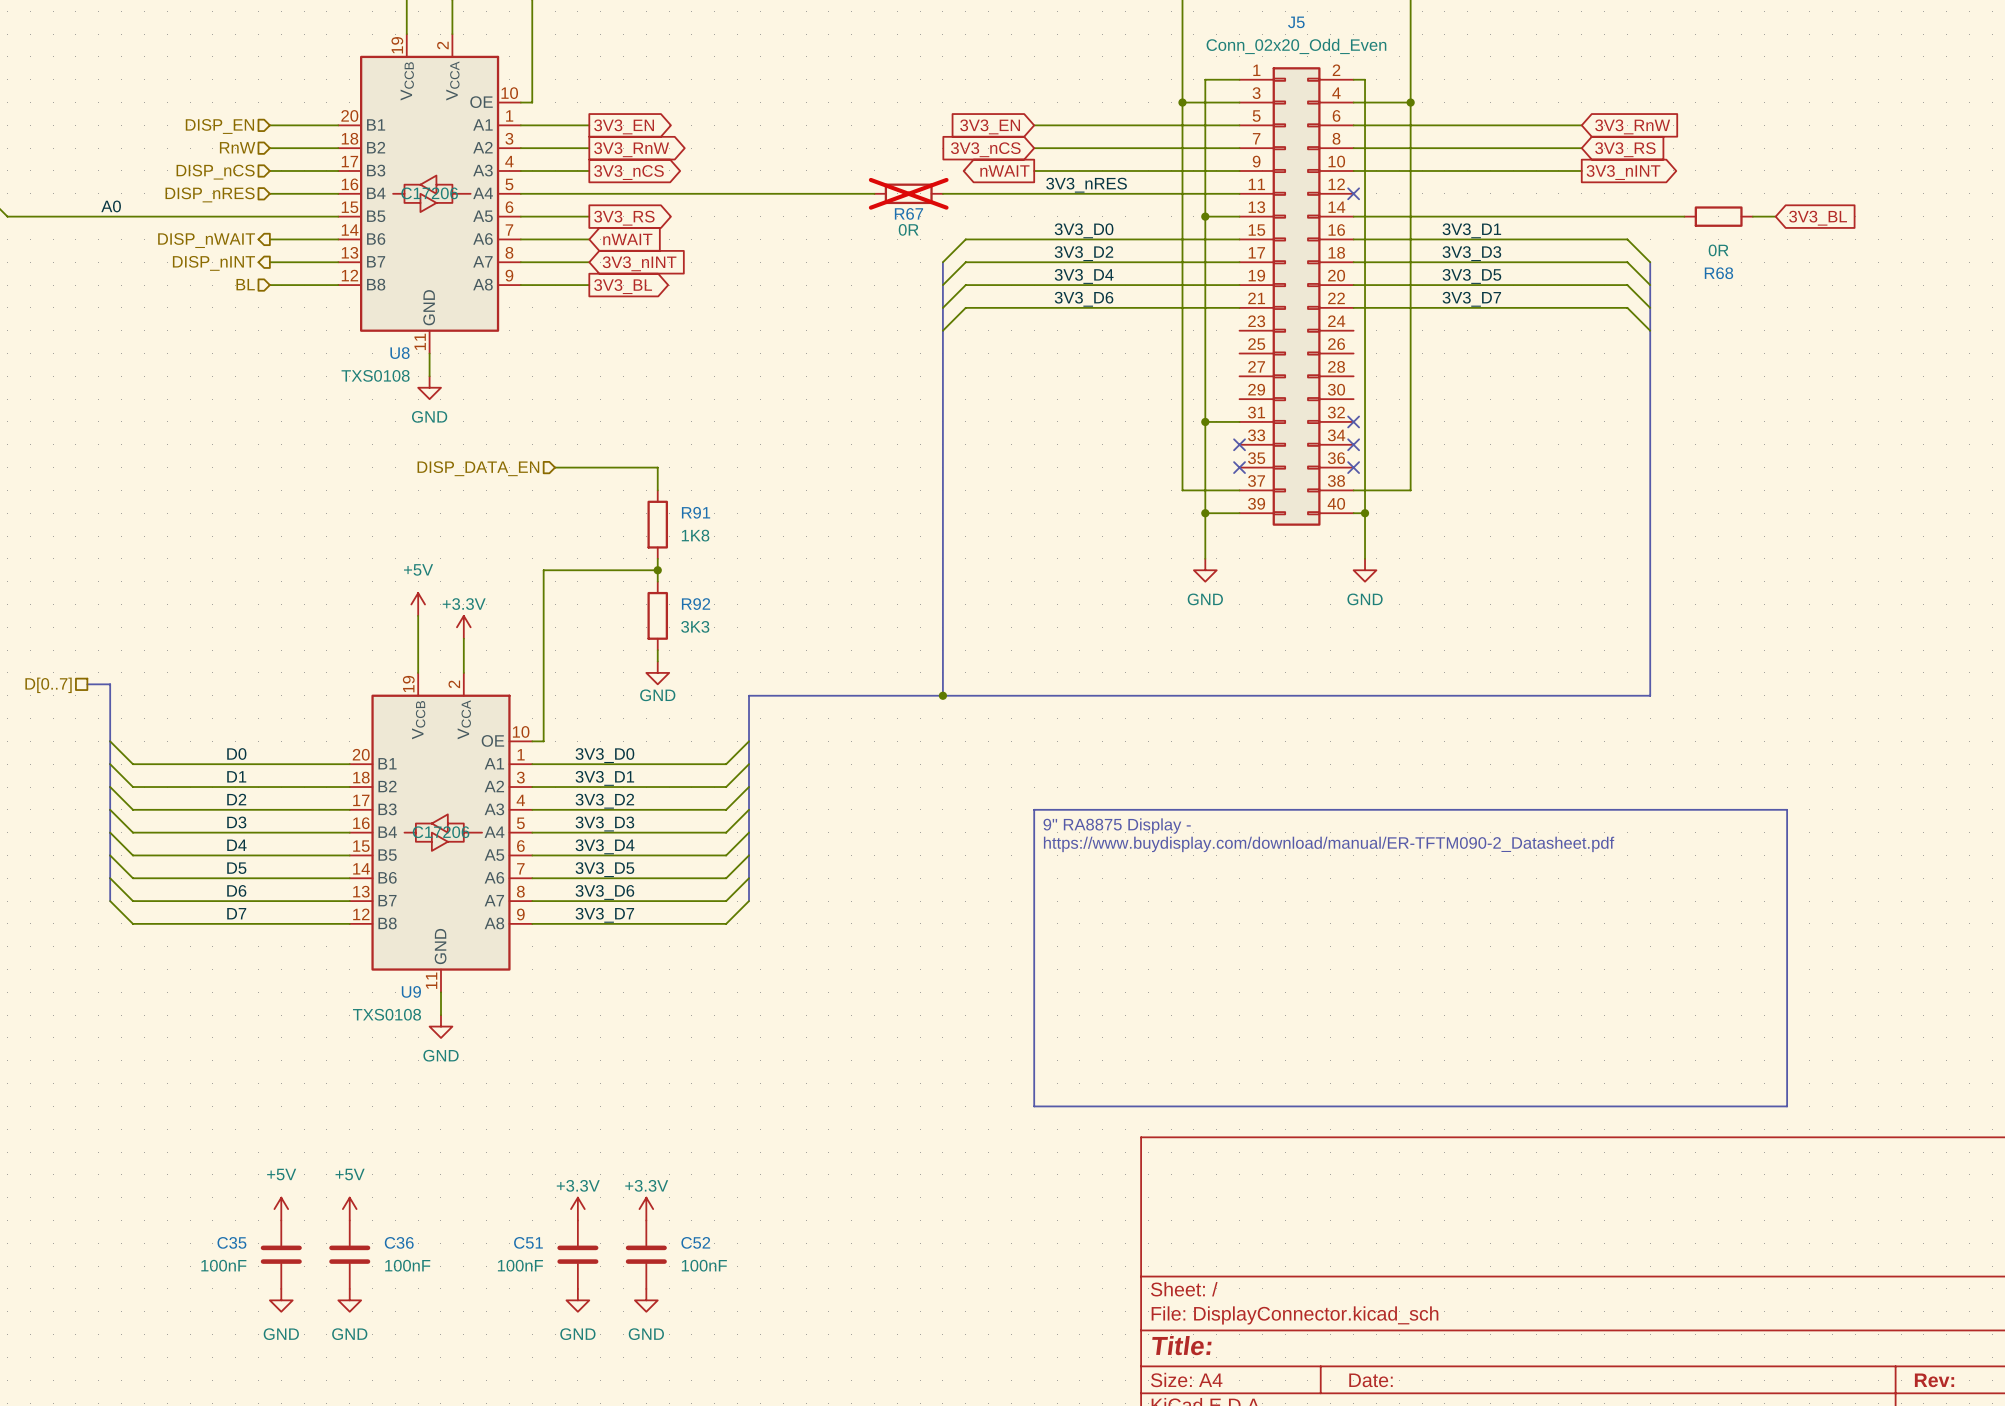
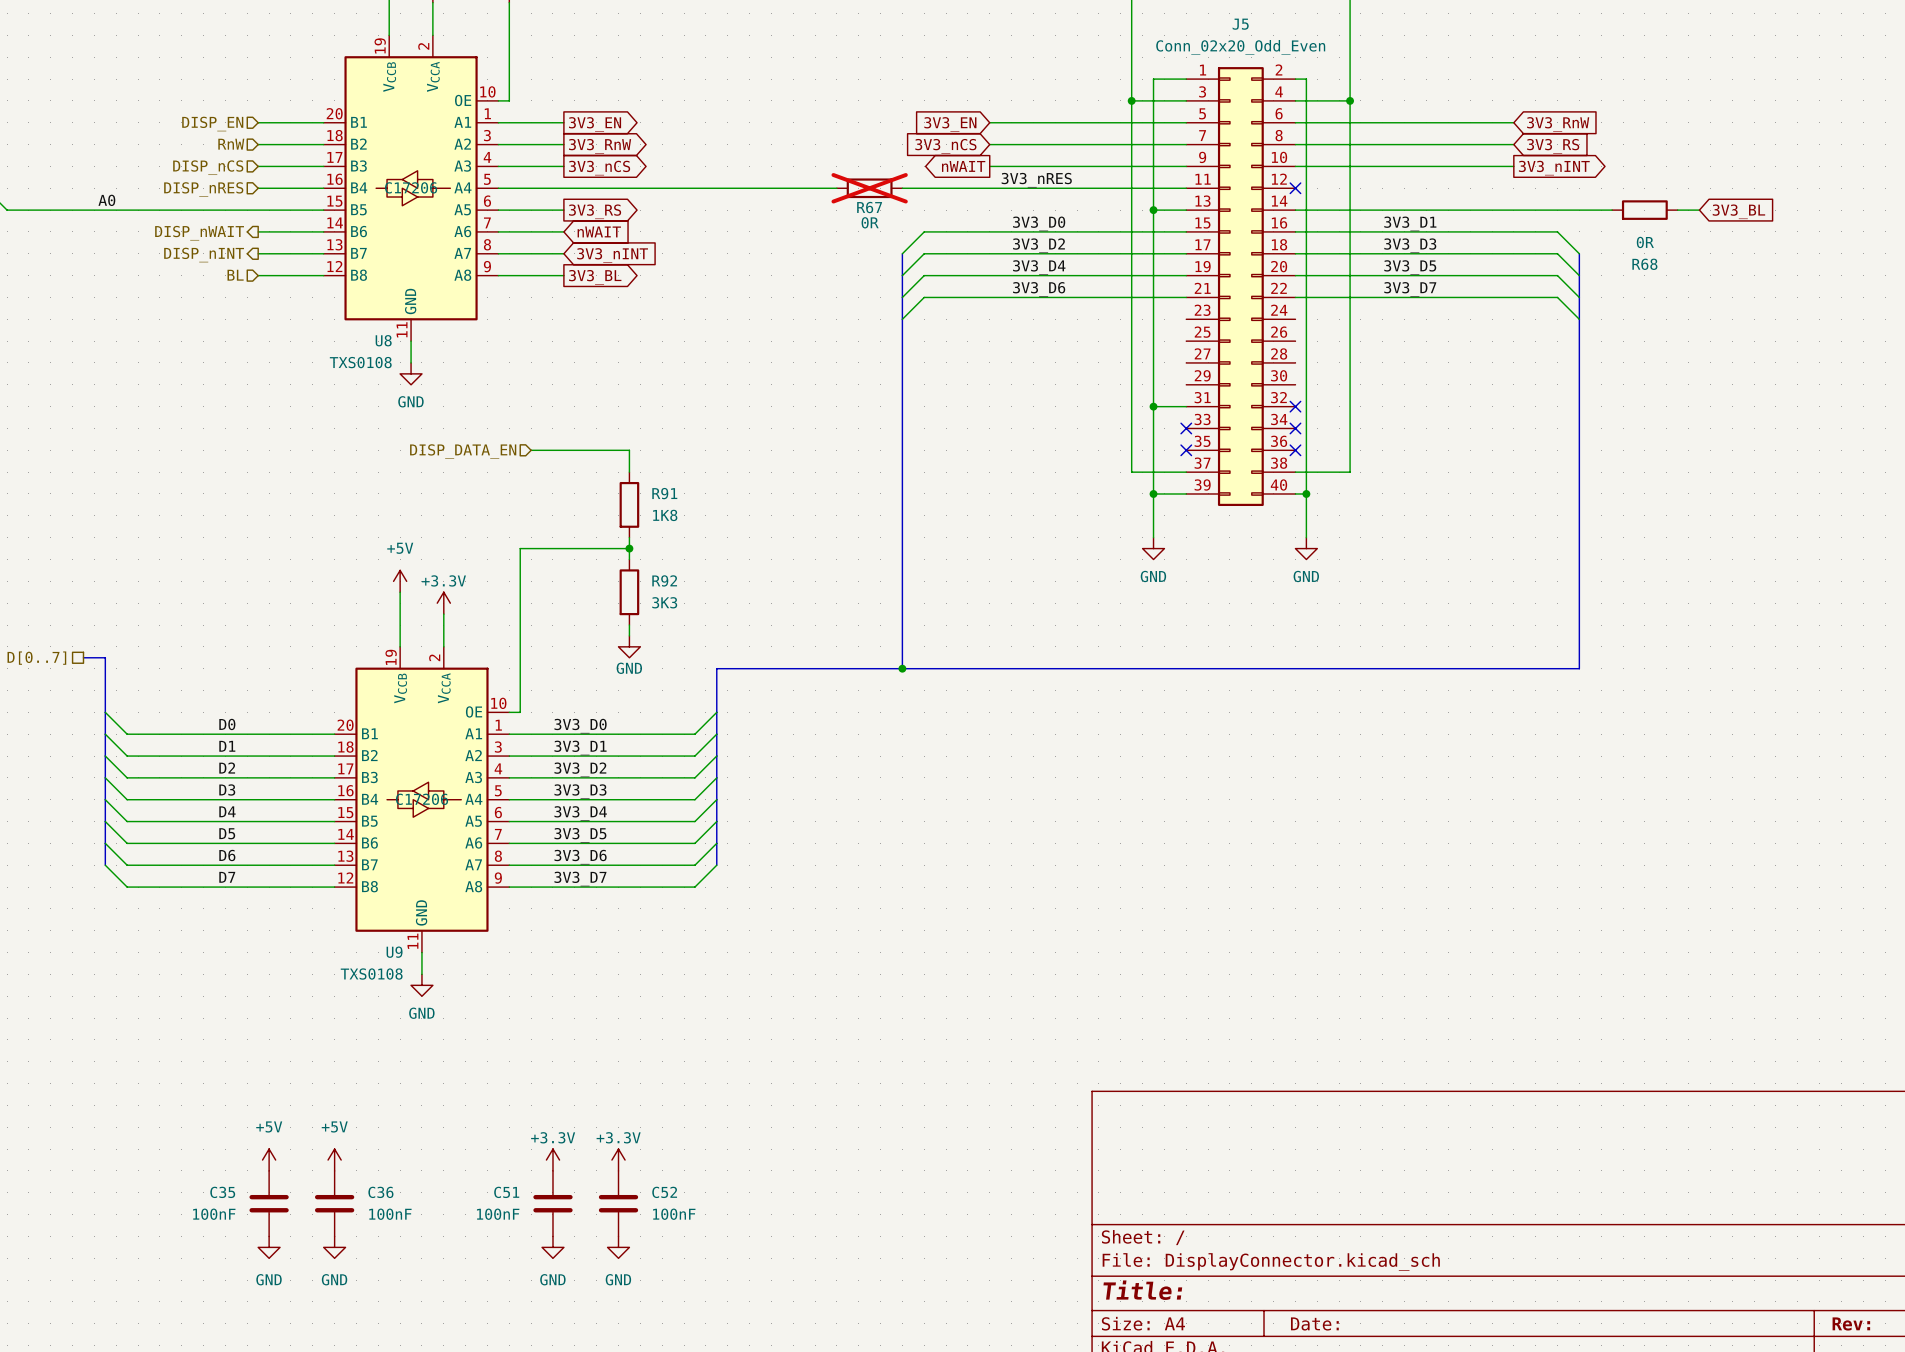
line: (1034, 809) (1787, 809) (1787, 1106) (1034, 1106) (1034, 809) -> none
text: 9" RA8875 Display - (1117, 826) -> none
text: https://www.buydisplay.com/download/manual/ER-TFTM090-2_Datasheet.pdf (1329, 844) -> none

